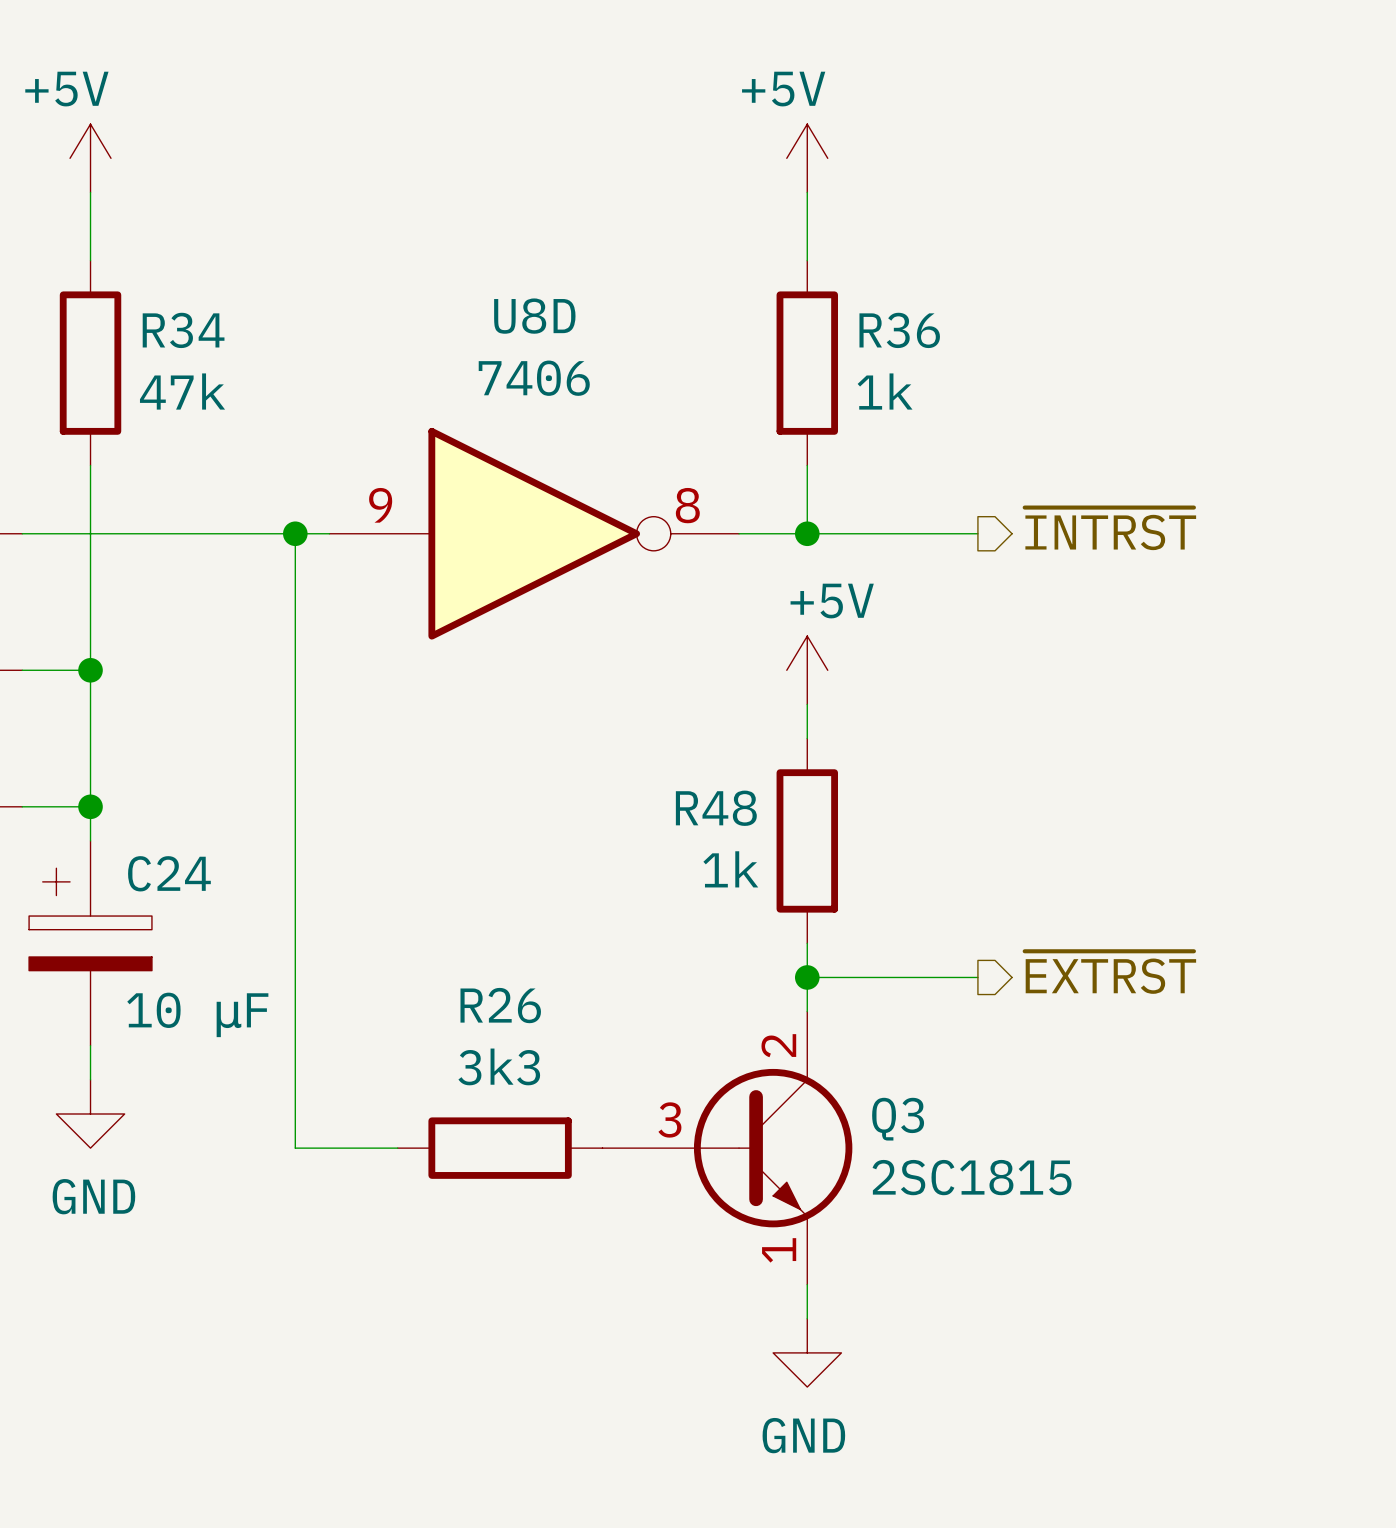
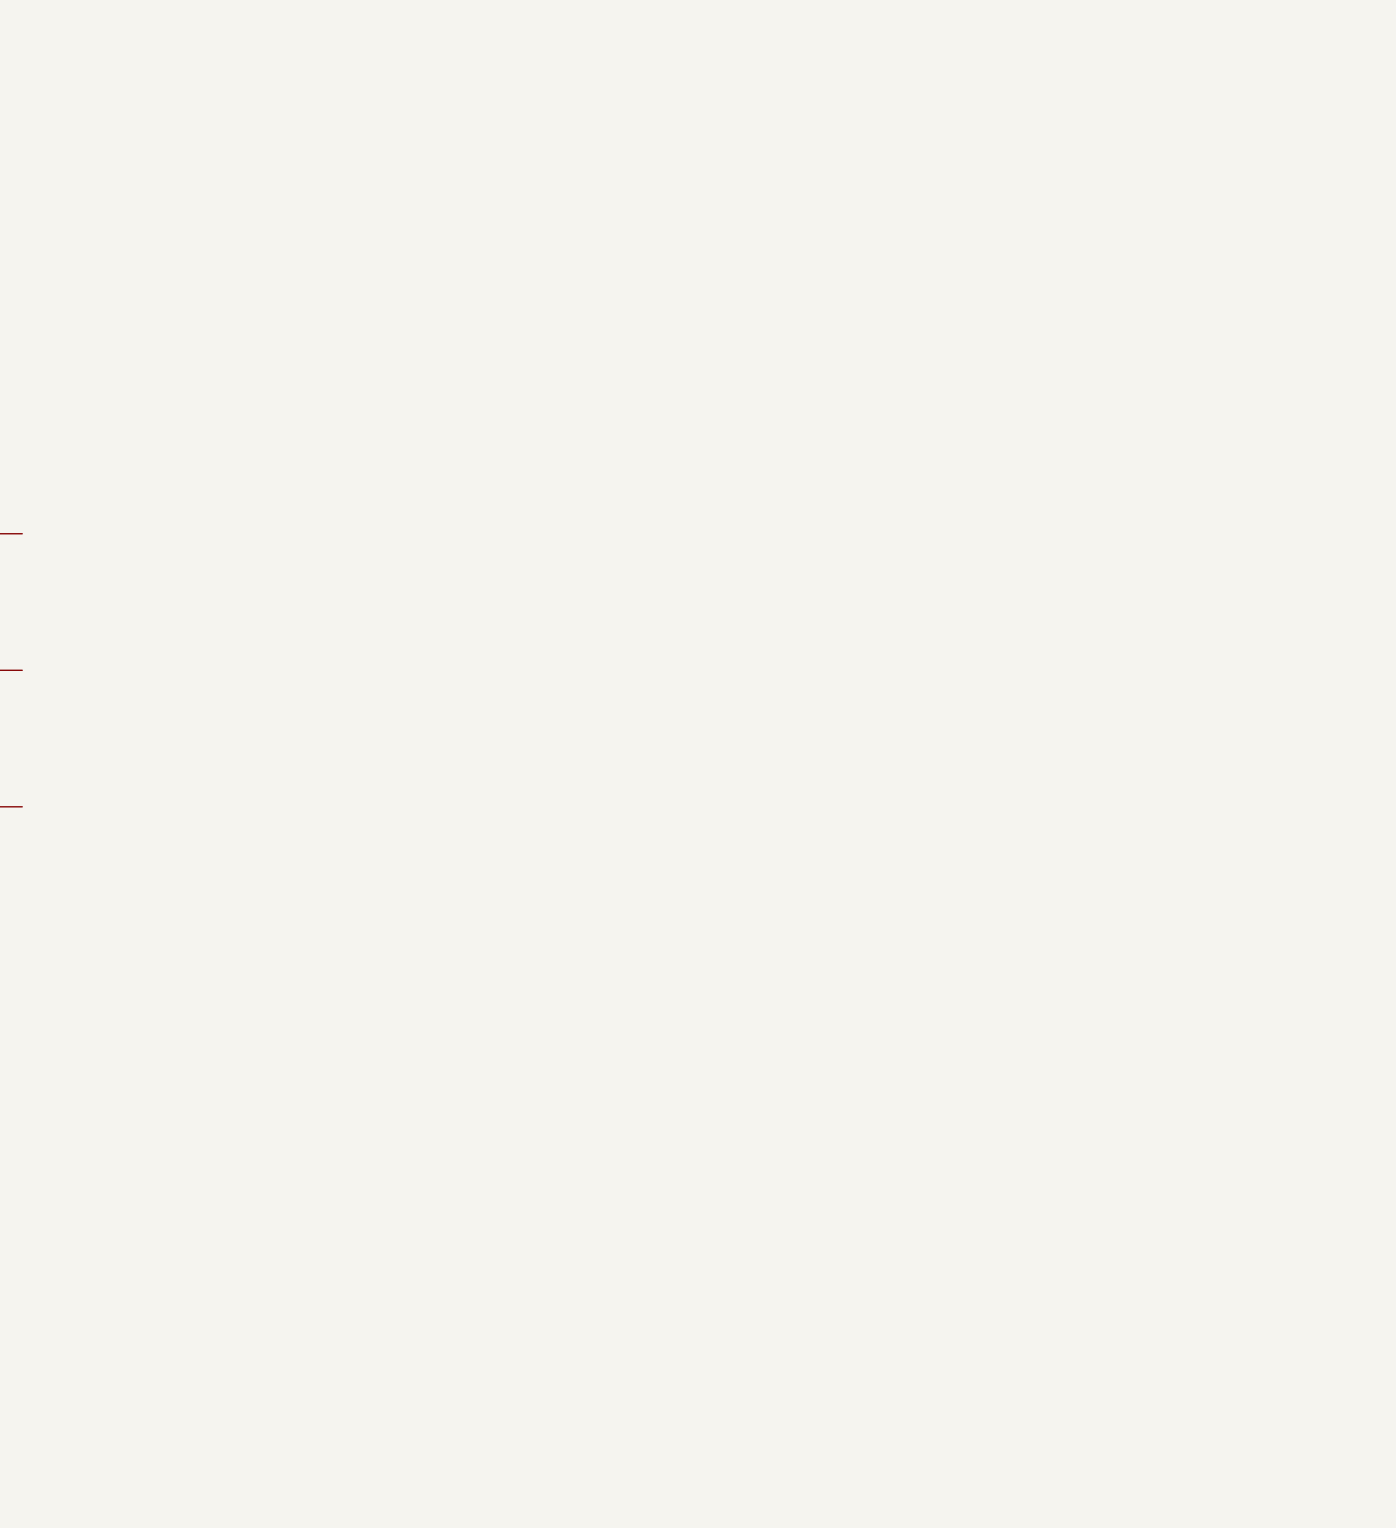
power symbol: +5V (90, 158) -> none
power symbol: +5V (807, 158) -> none
wire: (90, 192) (90, 260) -> none
wire: (807, 192) (807, 260) -> none
R34: 47k (90, 363) -> none
R36: 1k (807, 363) -> none
wire: (90, 465) (90, 840) -> none
wire: (807, 465) (807, 533) -> none
hierarchical label: ~{INTRST} (1110, 528) -> none
wire: (22, 533) (329, 533) -> none
wire: (295, 533) (295, 1148) (397, 1148) -> none
junction: (295, 533) -> none
U8D: 7406 (534, 533) -> none
wire: (739, 533) (977, 533) -> none
junction: (807, 533) -> none
wire: (22, 670) (90, 670) -> none
junction: (90, 670) -> none
power symbol: +5V (807, 670) -> none
wire: (807, 704) (807, 738) -> none
wire: (22, 806) (90, 806) -> none
junction: (90, 806) -> none
R48: 1k (807, 840) -> none
C24: 10 μF (90, 943) -> none
wire: (807, 943) (807, 1011) -> none
hierarchical label: ~{EXTRST} (1110, 972) -> none
wire: (807, 977) (977, 977) -> none
junction: (807, 977) -> none
wire: (90, 1045) (90, 1079) -> none
power symbol: GND (90, 1113) -> none
R26: 3k3 (500, 1148) -> none
Q3: 2SC1815 (727, 1148) -> none
wire: (807, 1284) (807, 1318) -> none
power symbol: GND (807, 1352) -> none

